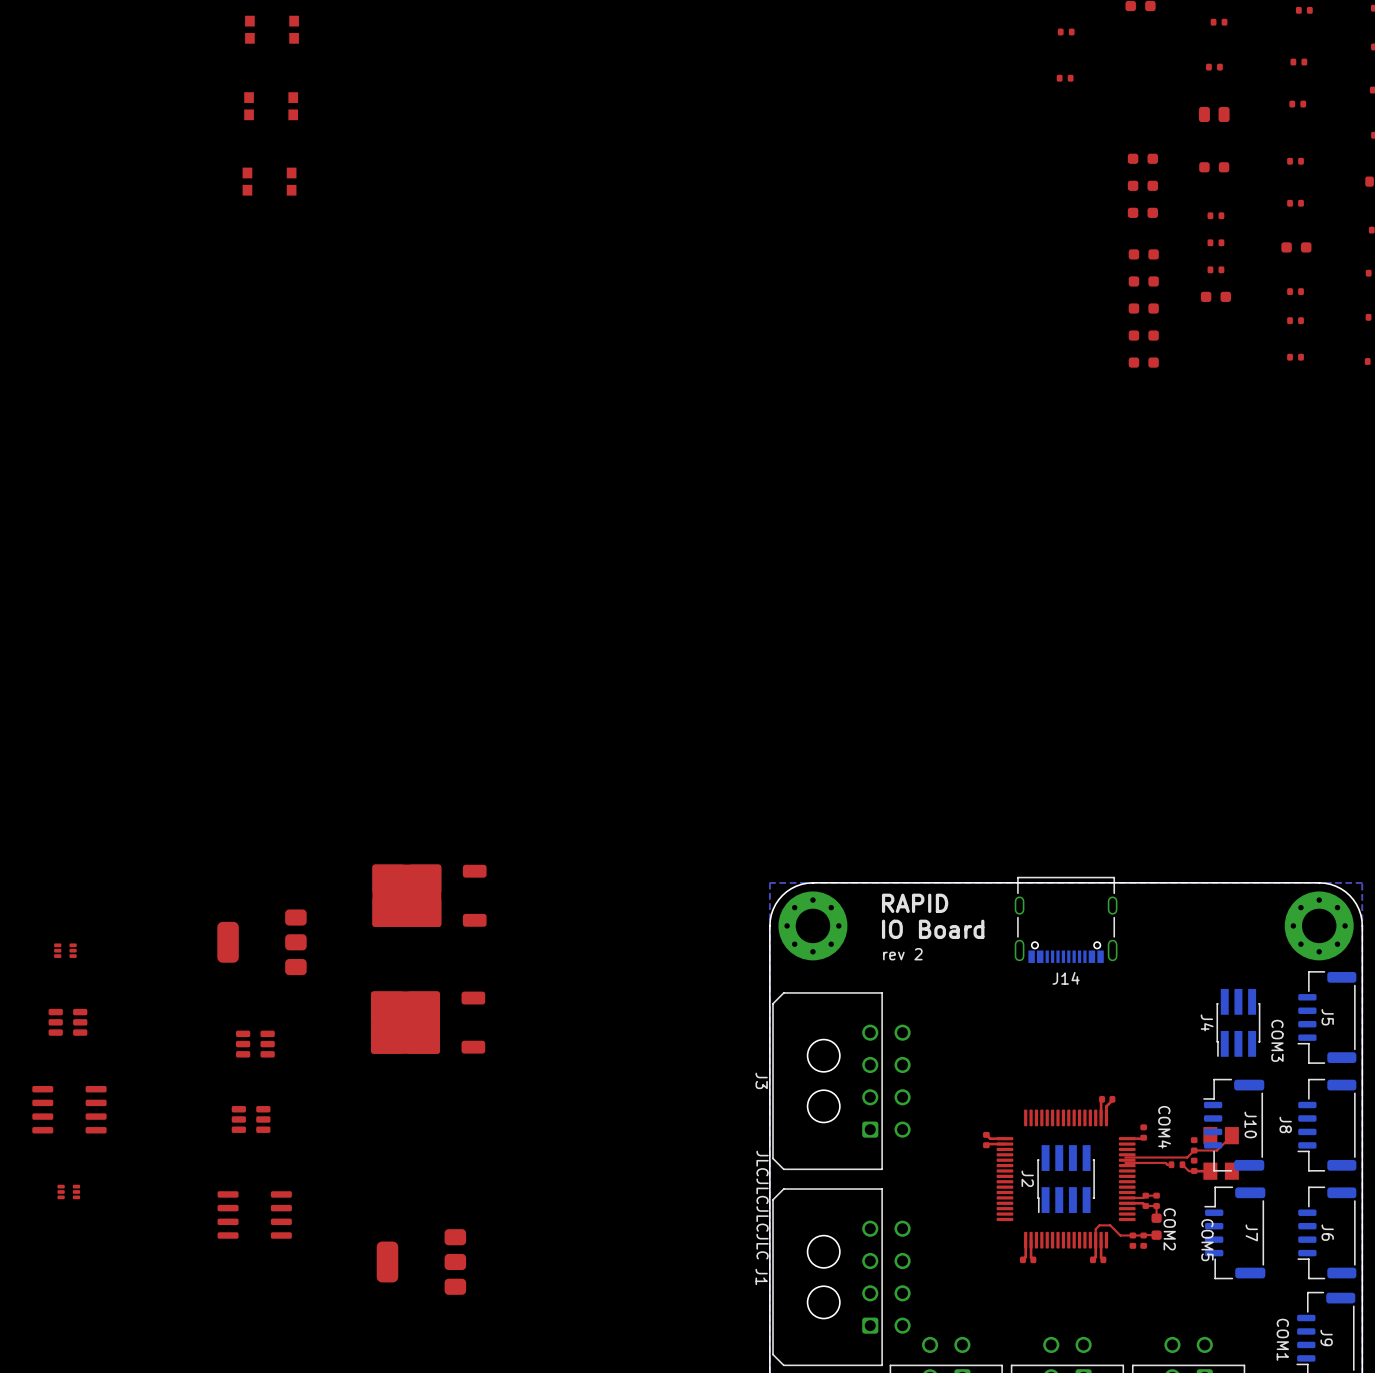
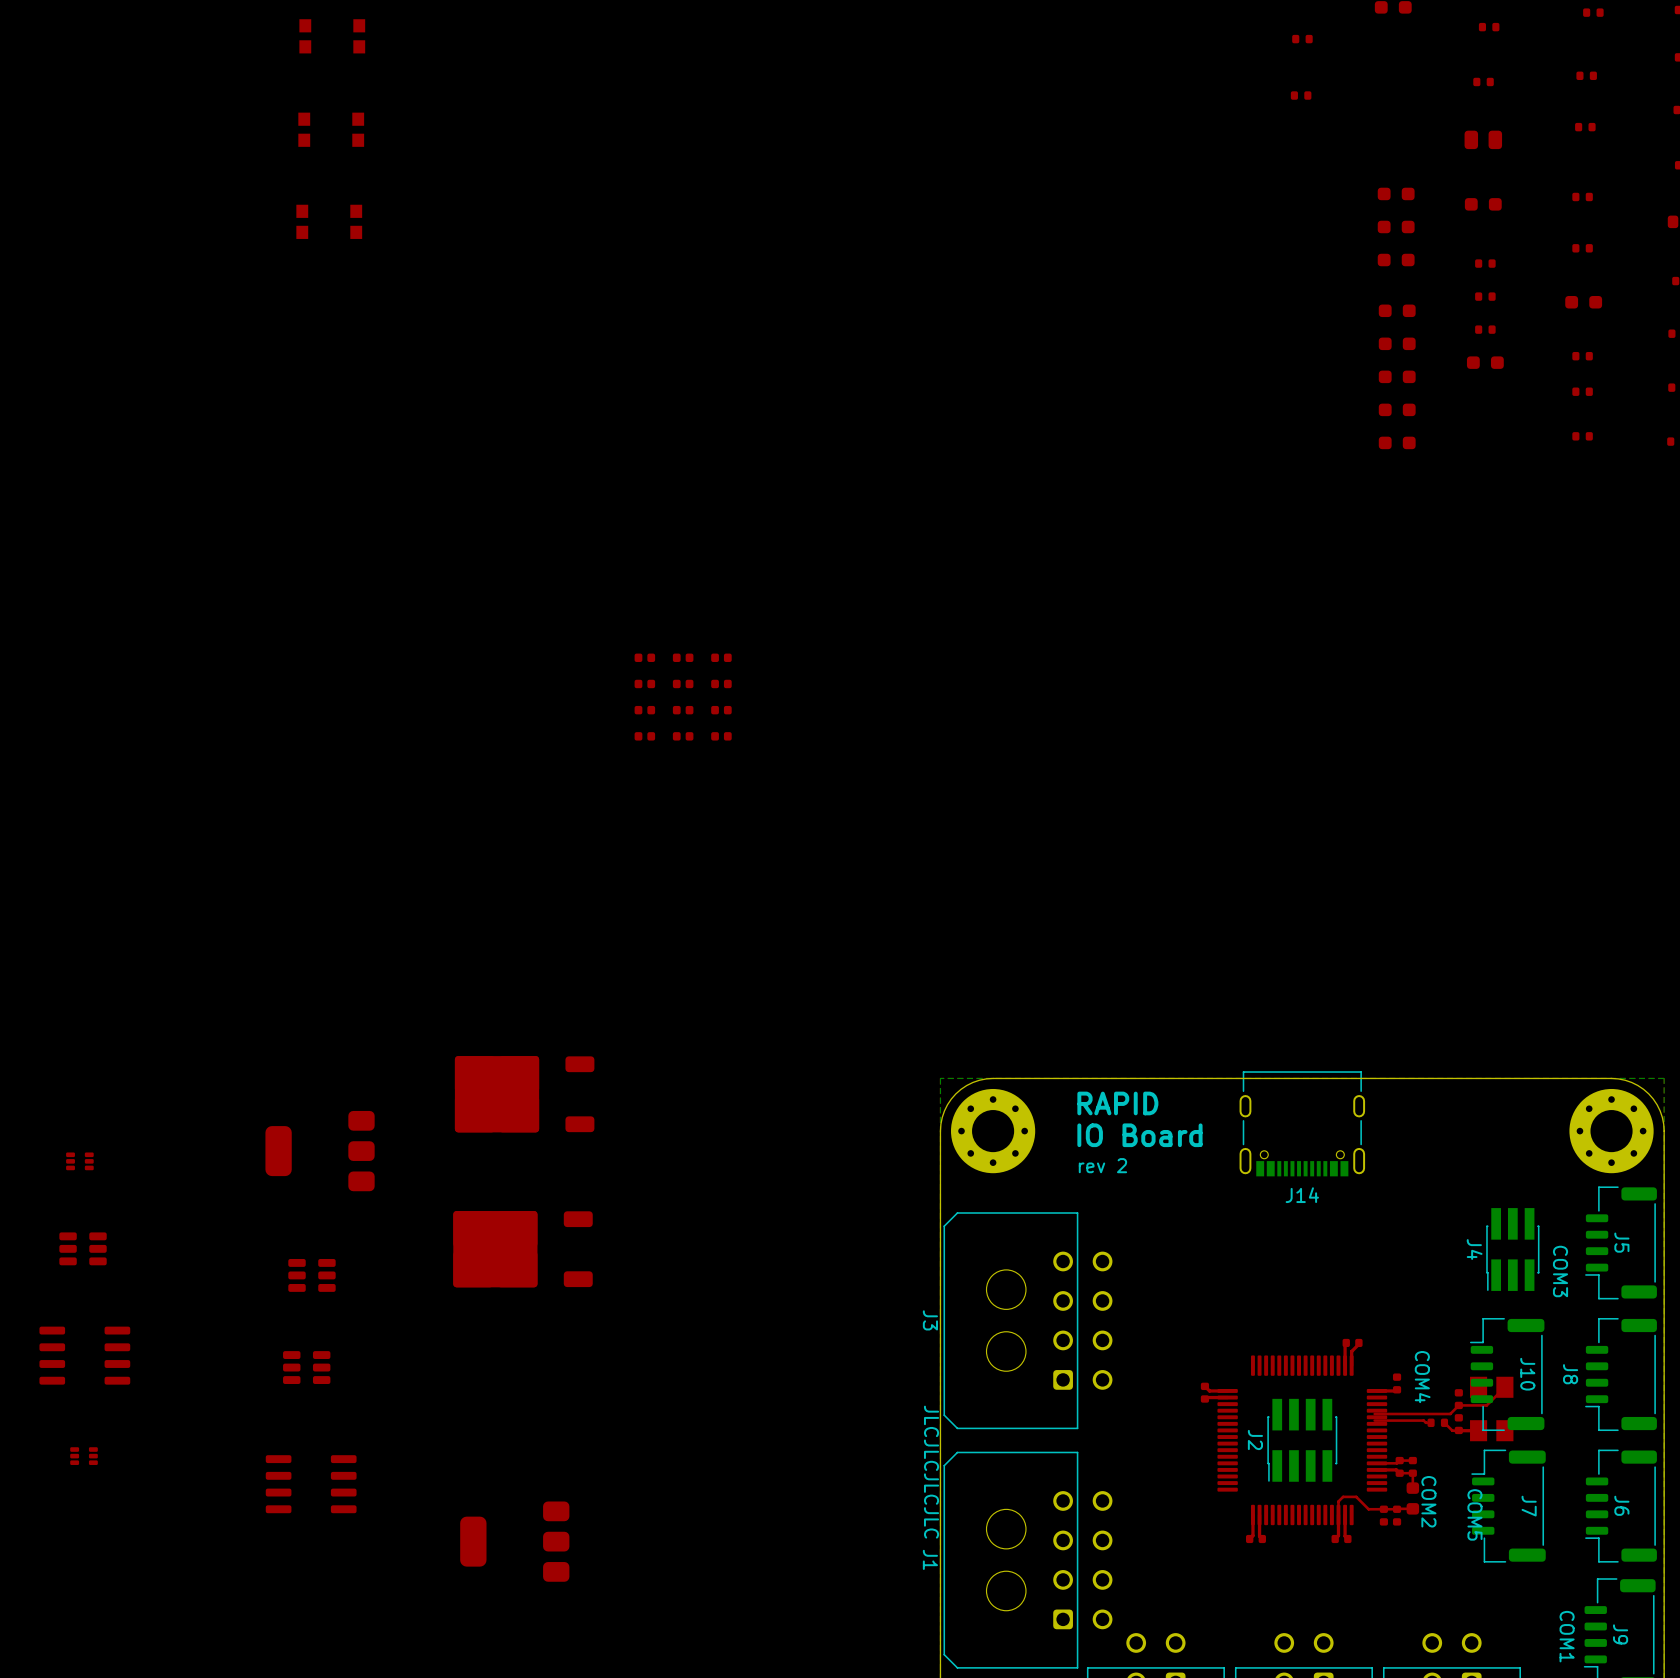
part: none -> (644, 657)
part: none -> (683, 657)
part: none -> (721, 657)
part: none -> (644, 683)
part: none -> (683, 683)
part: none -> (721, 683)
part: none -> (644, 710)
part: none -> (683, 710)
part: none -> (721, 710)
part: none -> (644, 736)
part: none -> (683, 736)
part: none -> (721, 736)

